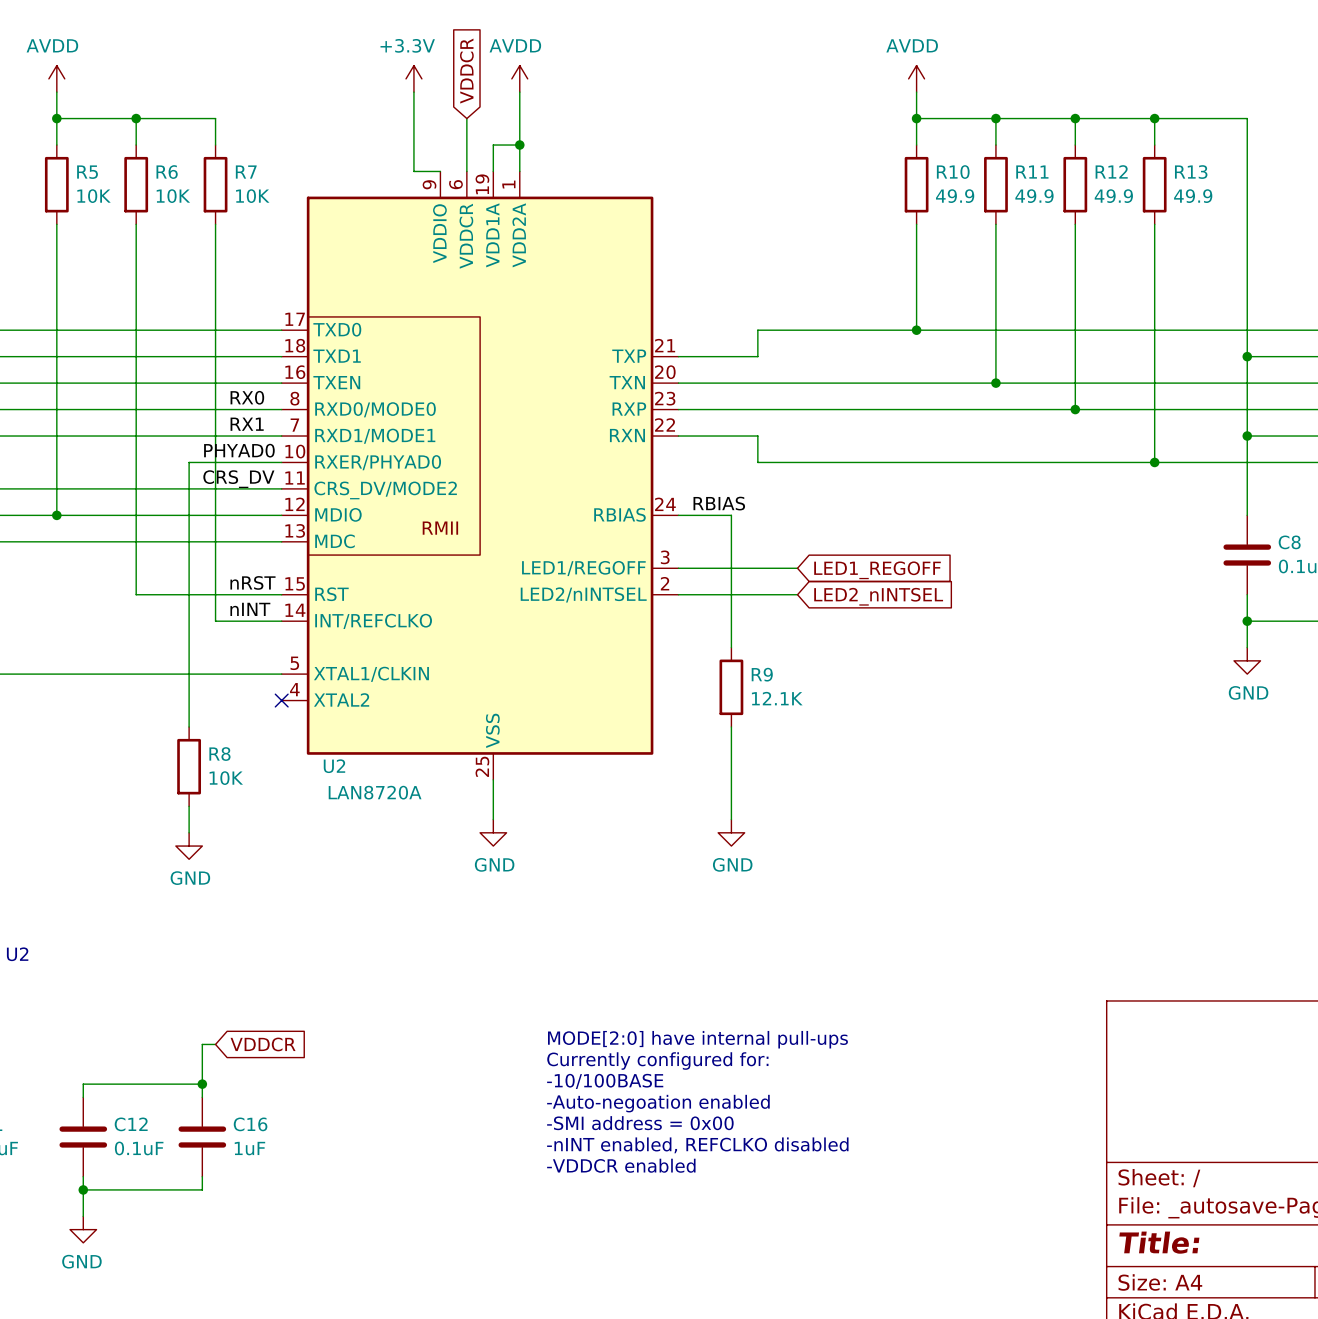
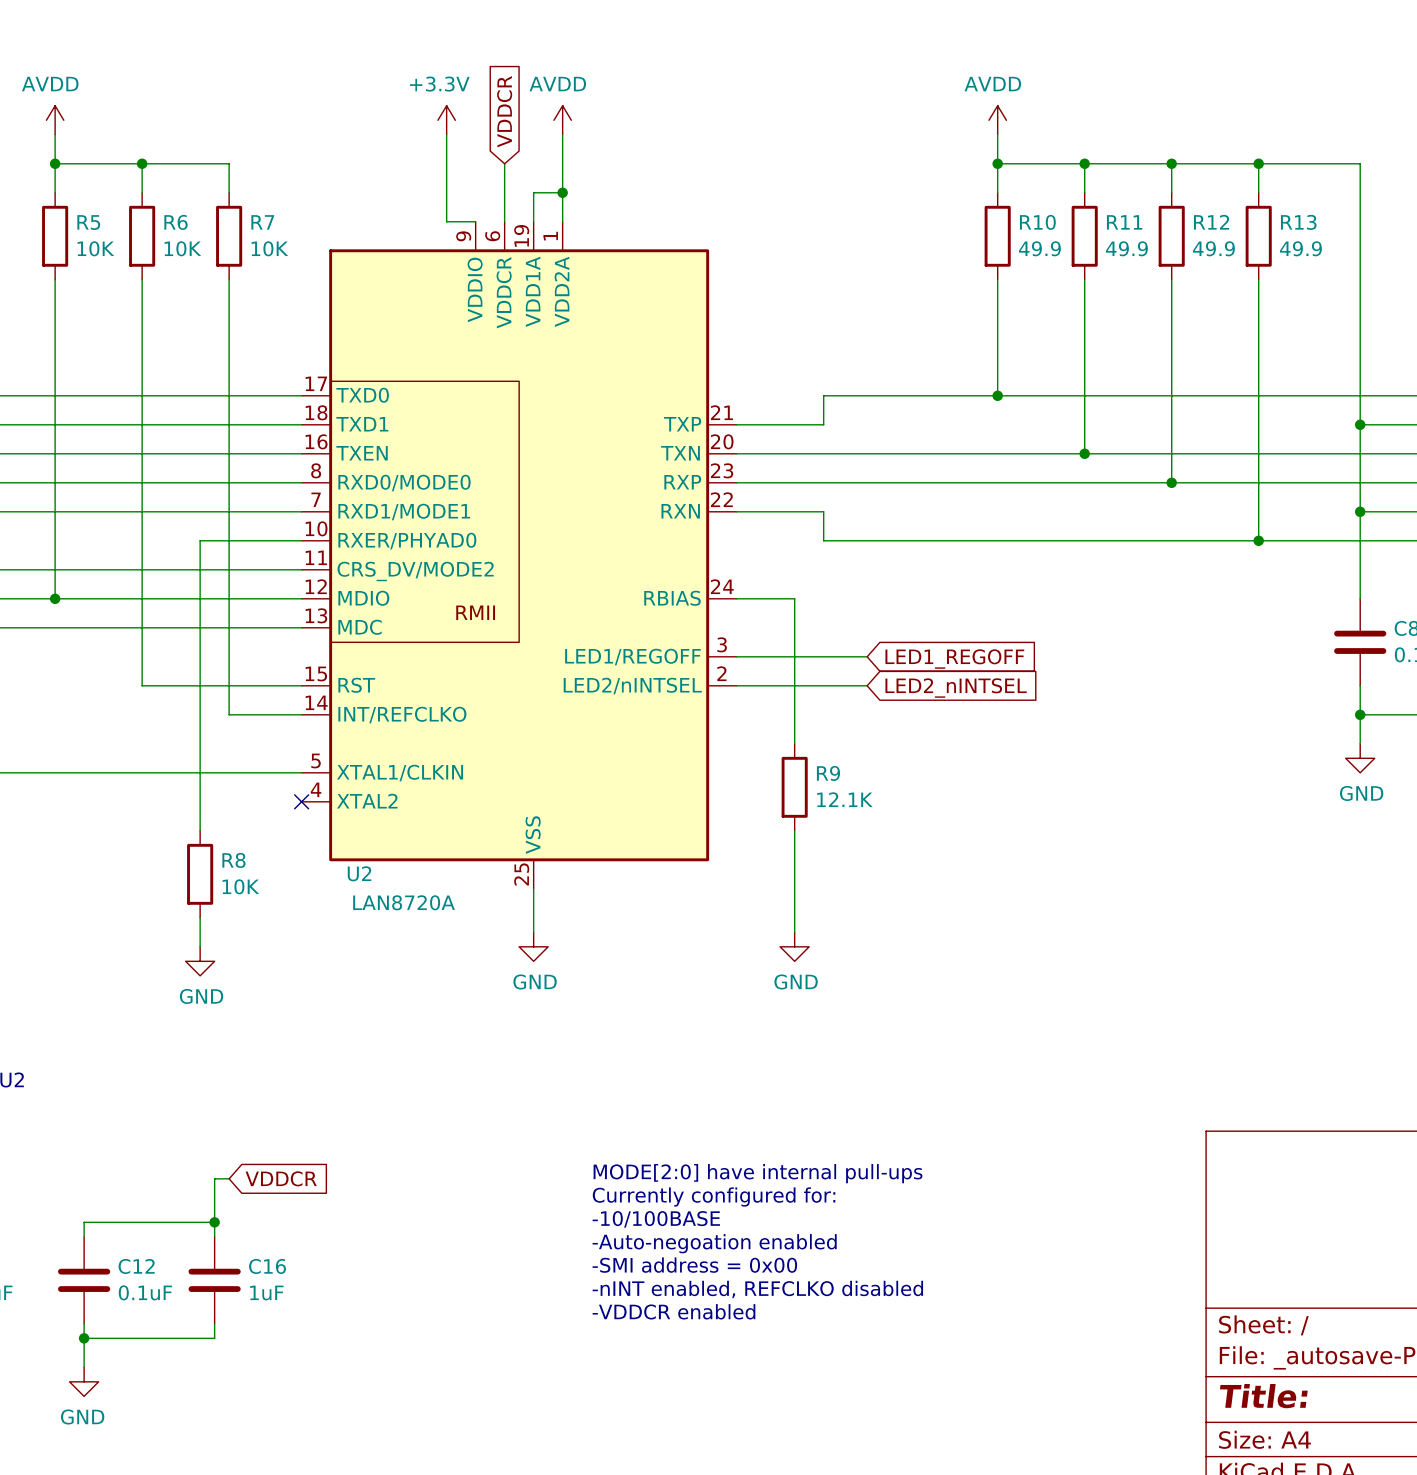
label: RX0 (247, 397) -> none
label: RX1 (247, 424) -> none
label: PHYAD0 (239, 450) -> none
label: CRS_DV (238, 479) -> none
label: RBIAS (719, 503) -> none
label: nRST (252, 582) -> none
label: nINT (250, 609) -> none

